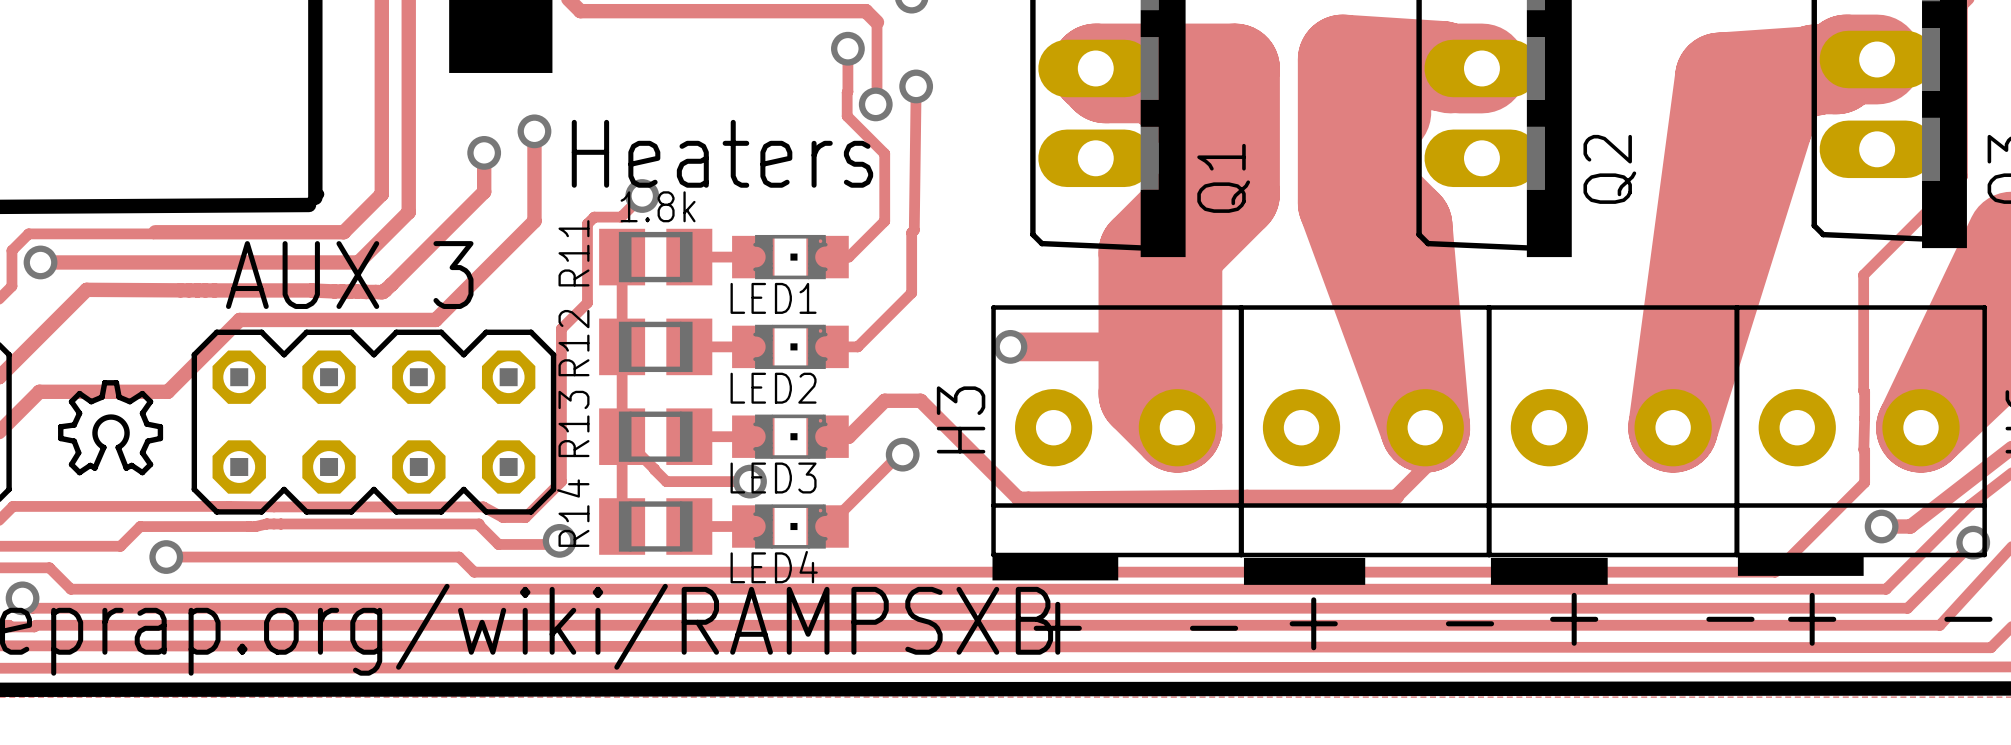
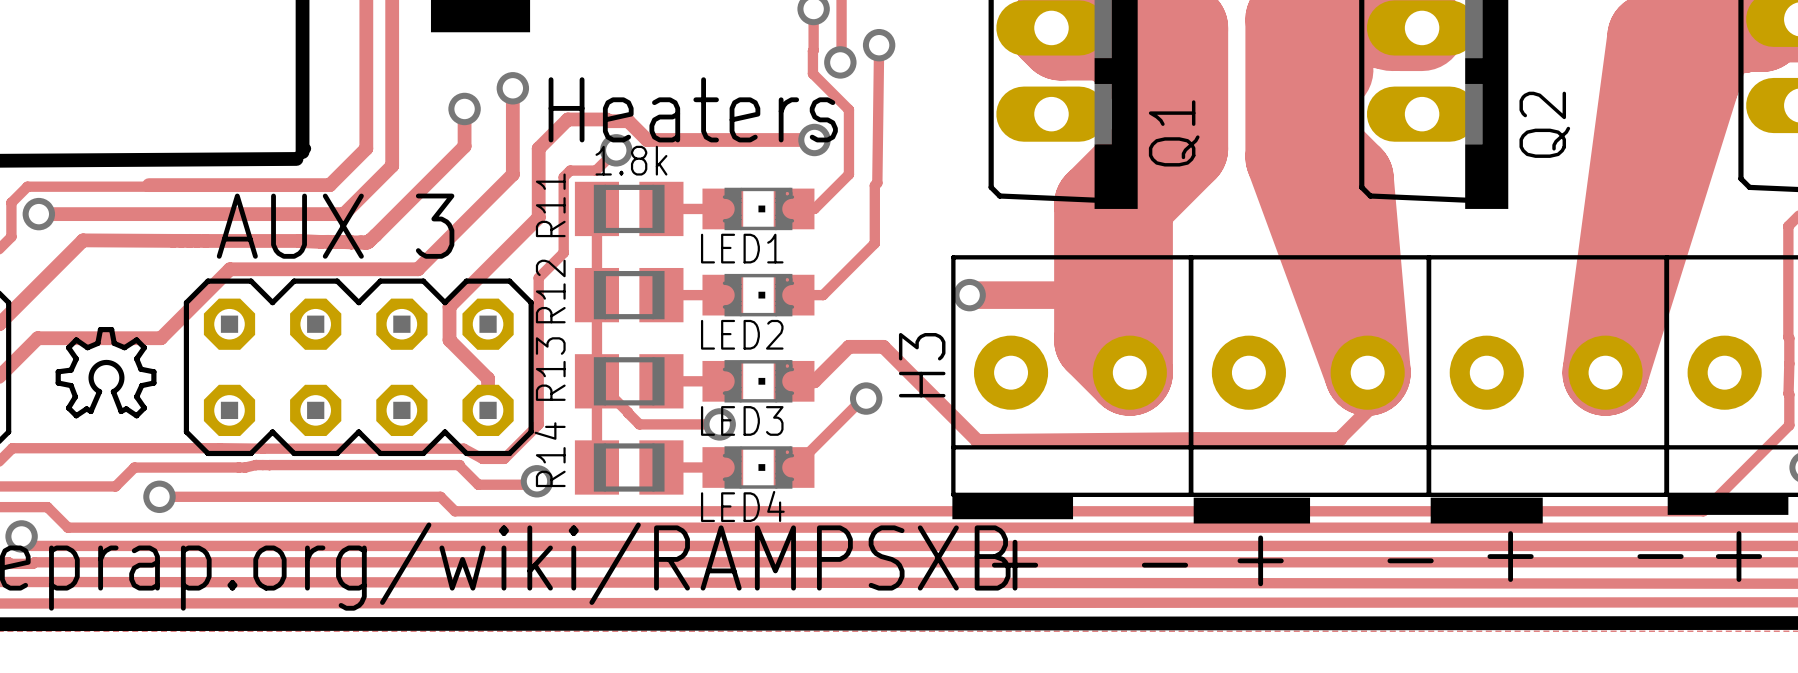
track: none -> (814, 139) (647, 139) (628, 121) (567, 119) (538, 148) (538, 217) (449, 306) (449, 340) (488, 378) (488, 410)
via: none -> (814, 139)

